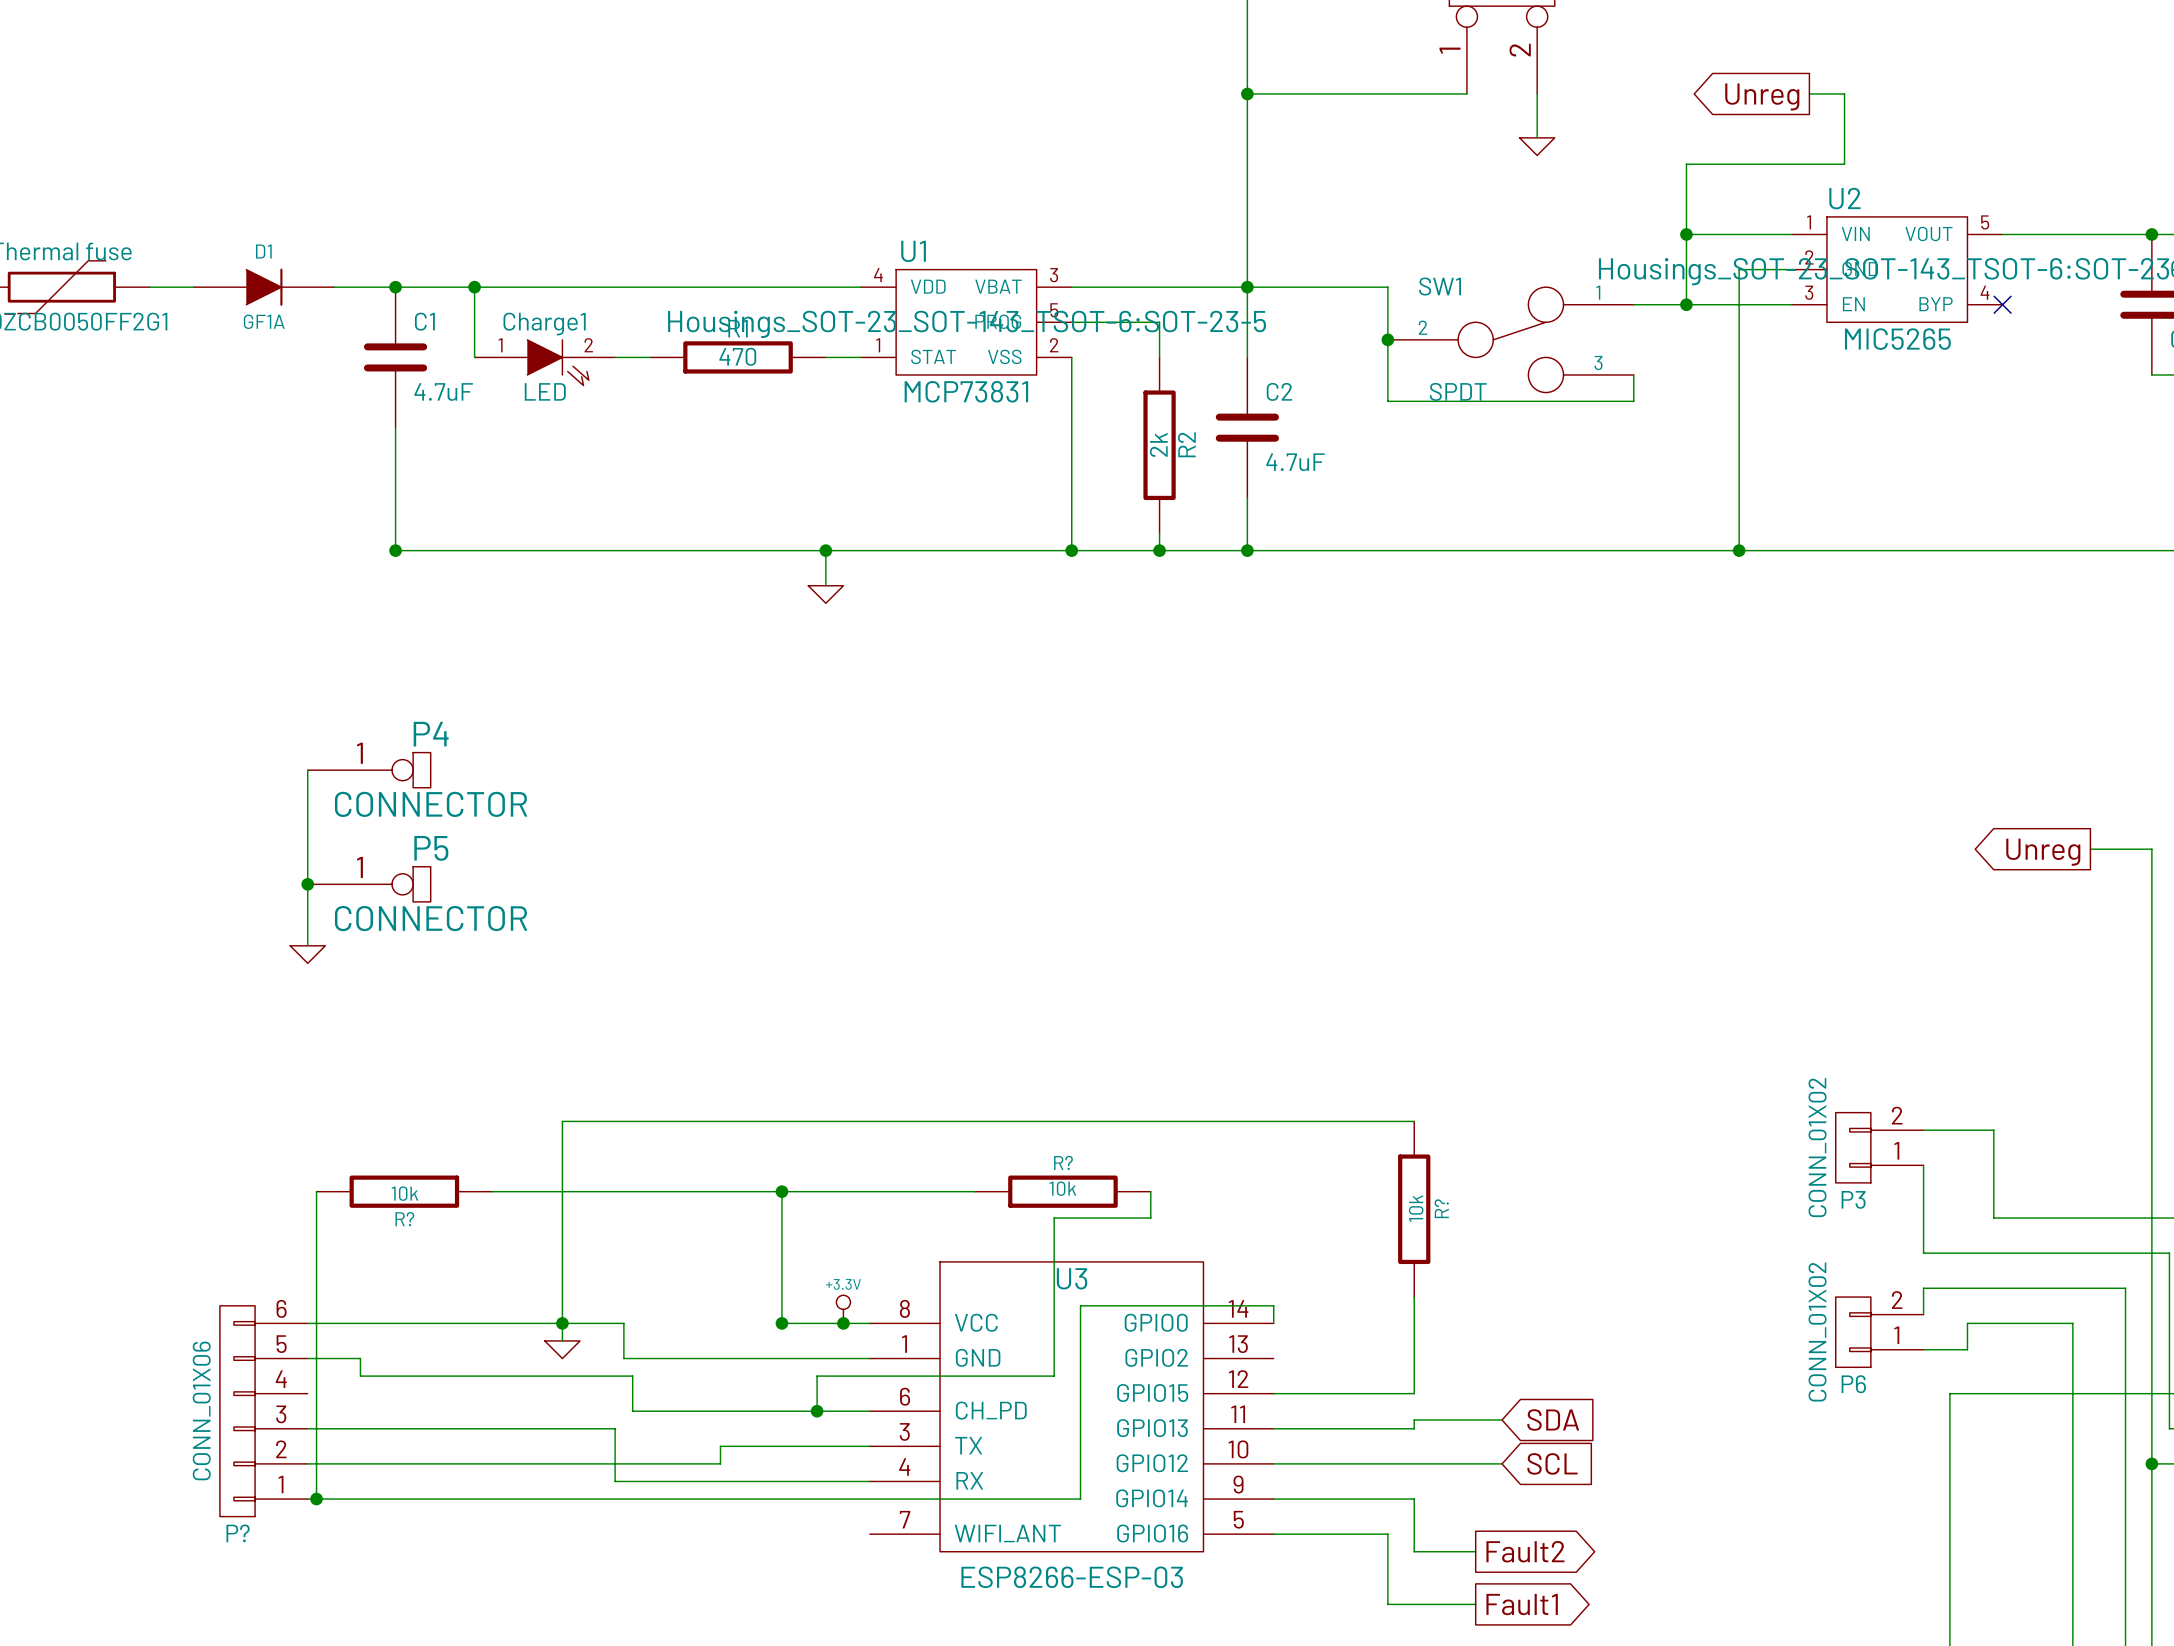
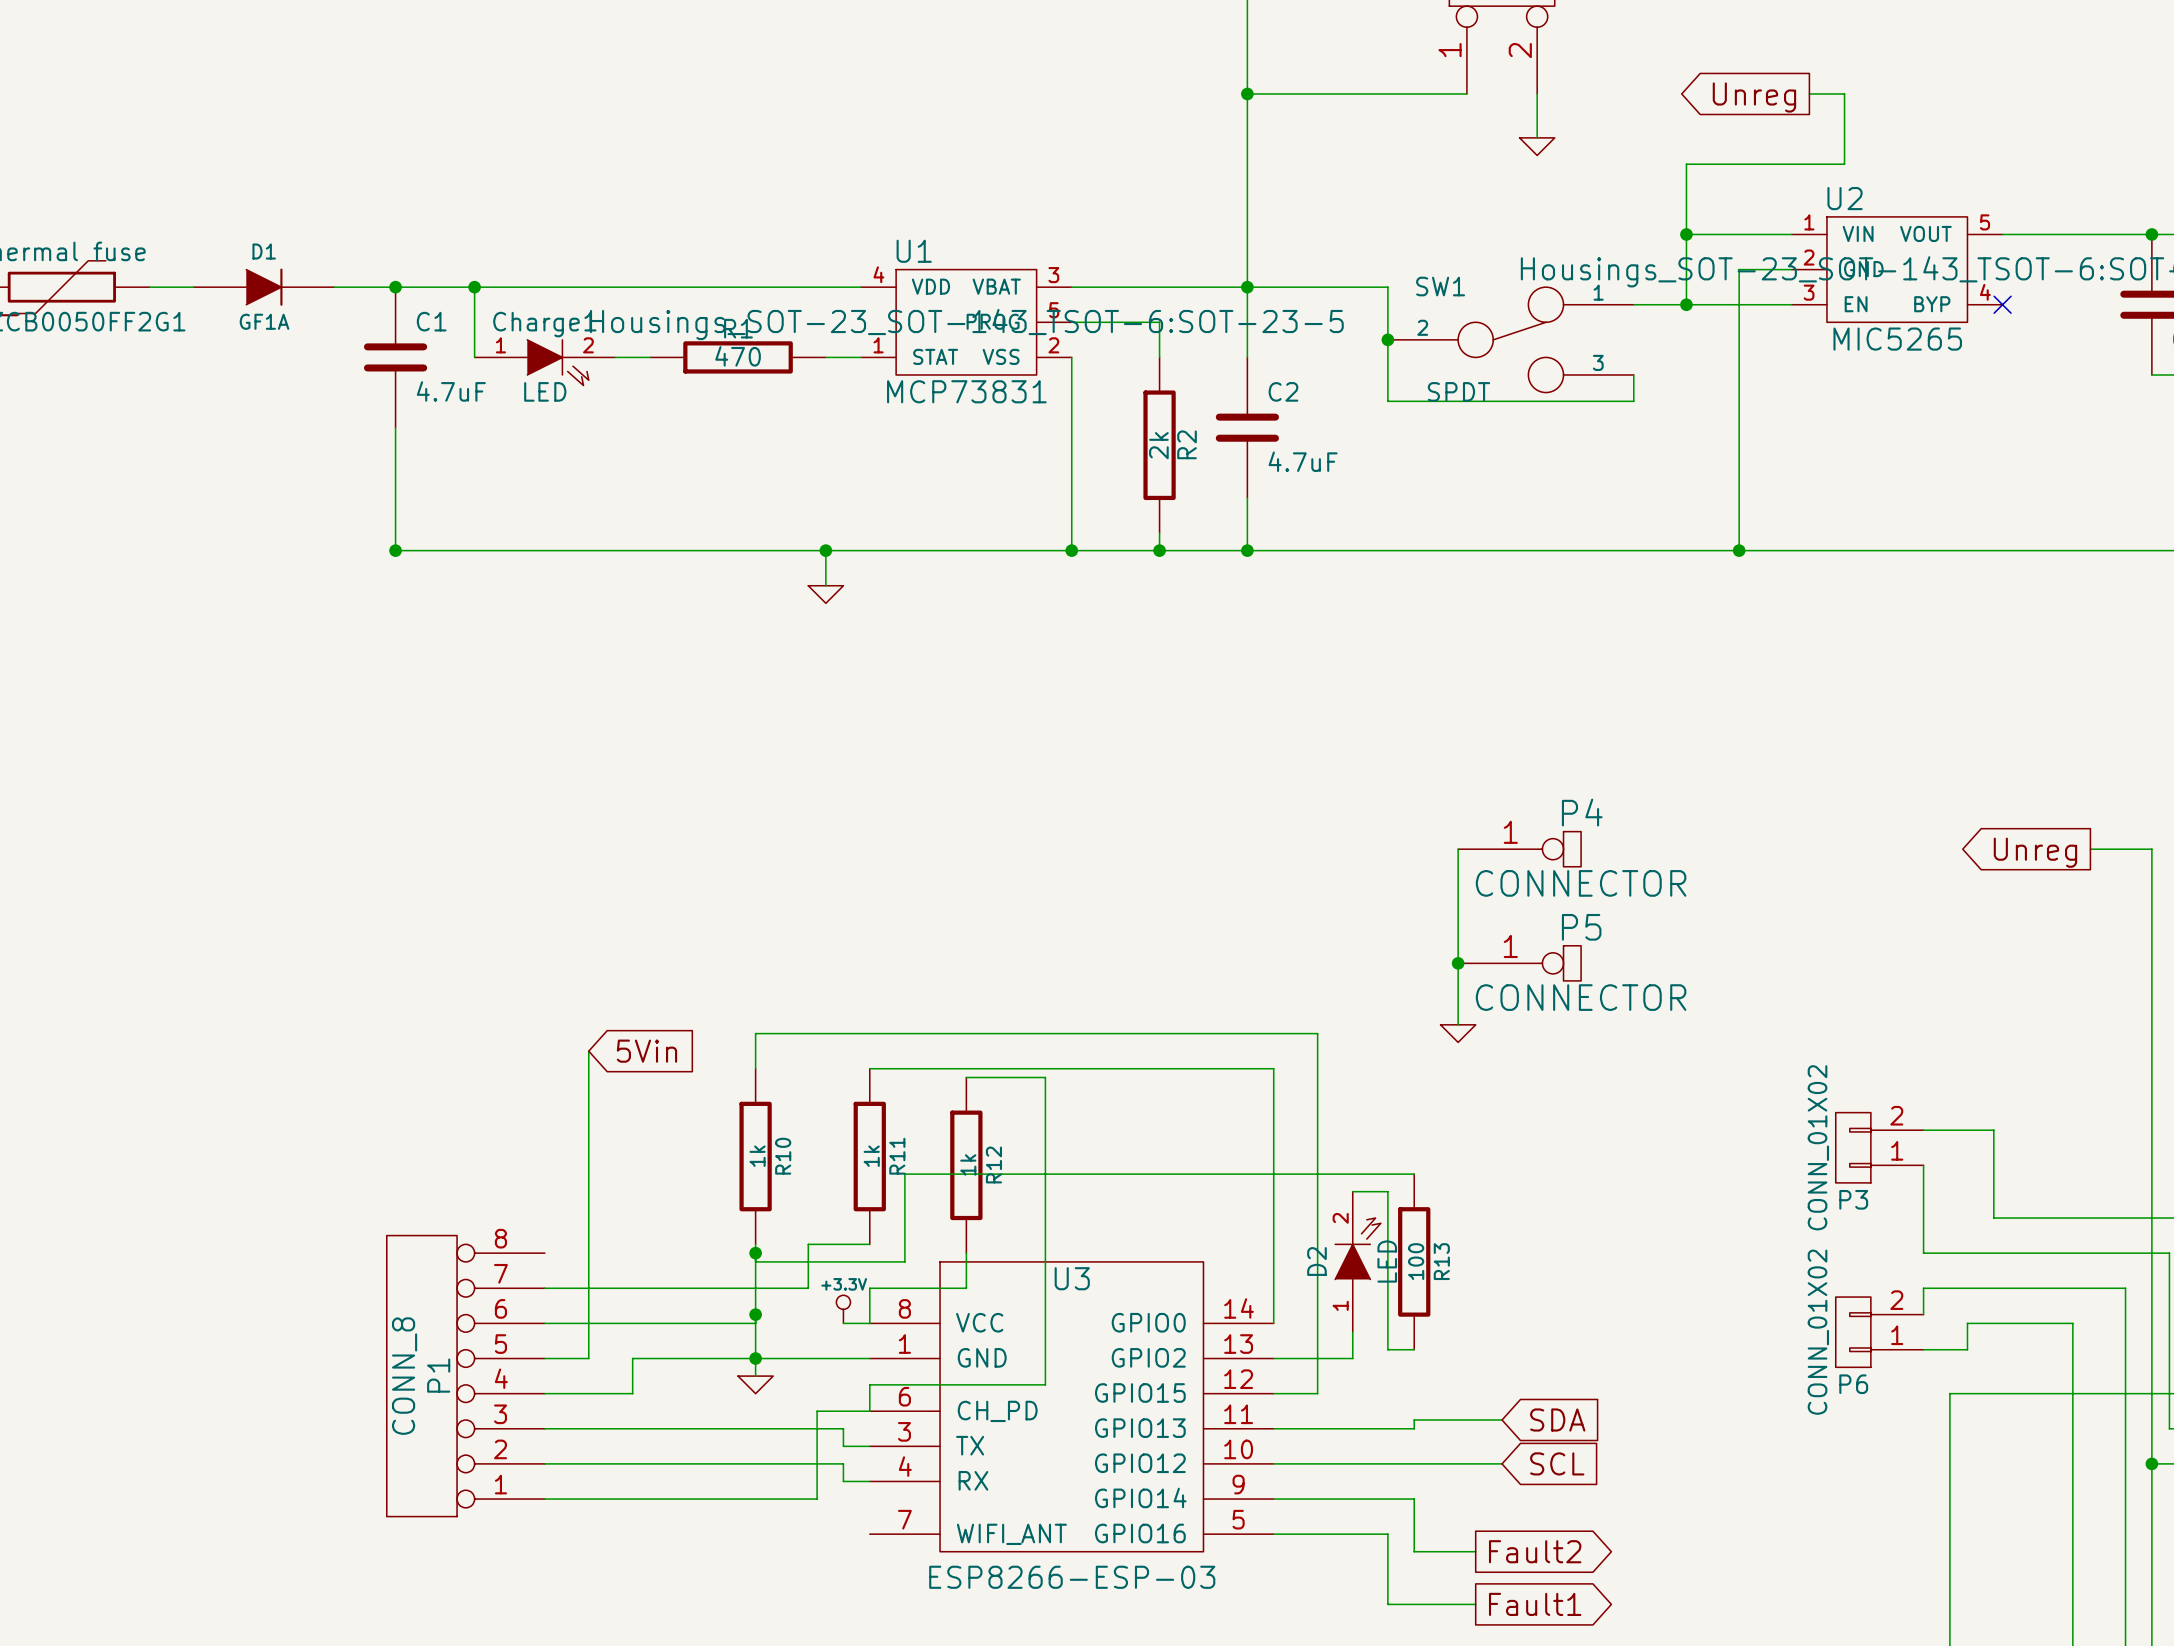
wire: (307, 770) (307, 945) -> none
P4 position: (369, 770) -> (1519, 849)
wire: none -> (1458, 849) (1458, 1024)
junction: (307, 884) -> none
P5 position: (369, 884) -> (1519, 963)
power symbol: (307, 954) -> none
junction: none -> (1458, 963)
power symbol: none -> (1458, 1033)
wire: none -> (588, 1051) (588, 1358) (544, 1358)
global label: none -> 5Vin (646, 1051)
wire: none -> (966, 1077) (1045, 1077) (1045, 1384) (869, 1384) (869, 1411)
wire: (1414, 1121) (562, 1121) (562, 1340) -> none
R10: none -> 1k (755, 1156)
R11: none -> 1k (869, 1156)
R12: none -> 1k (966, 1165)
wire: none -> (1414, 1174) (904, 1174) (904, 1261) (755, 1261)
wire: (316, 1191) (316, 1499) -> none
R?: 10k (404, 1191) -> none
wire: (492, 1191) (975, 1191) -> none
wire: (781, 1191) (781, 1323) (843, 1323) -> none
junction: (781, 1191) -> none
R?: 10k (1062, 1191) -> none
wire: (1150, 1191) (1150, 1218) (1054, 1218) (1054, 1376) (817, 1376) (817, 1411) (632, 1411) (632, 1393) -> (544, 1393) (632, 1393)
wire: none -> (1352, 1191) (1387, 1191) (1387, 1349) (1414, 1349)
R?: 10k (1414, 1209) -> none
wire: none -> (755, 1244) (755, 1376)
wire: none -> (869, 1244) (808, 1244) (808, 1288) (544, 1288)
junction: none -> (755, 1253)
wire: none -> (966, 1253) (966, 1288) (869, 1288) (869, 1323)
D2: none -> LED (1358, 1261)
R13: none -> 100 (1414, 1261)
wire: (1414, 1297) (1414, 1393) (1317, 1393) -> (755, 1068) (755, 1033) (1317, 1033) (1317, 1393)
wire: (1273, 1305) (1080, 1305) (1080, 1499) (817, 1499) -> (1273, 1305) (1273, 1068) (869, 1068)
junction: none -> (755, 1314)
wire: (307, 1323) (544, 1323) -> none
junction: (562, 1323) -> none
wire: (623, 1323) (623, 1358) (632, 1358) -> (632, 1376) (632, 1358)
wire: none -> (623, 1323) (755, 1323)
junction: (781, 1323) -> none
junction: (843, 1323) -> none
wire: none -> (1352, 1332) (1352, 1358) (1273, 1358)
power symbol position: (562, 1349) -> (755, 1384)
wire: (307, 1358) (360, 1358) (360, 1376) (632, 1376) -> none
junction: none -> (755, 1358)
P1: none -> CONN_8 (465, 1376)
P?: CONN_01X06 (263, 1411) -> none
wire: none -> (817, 1411) (817, 1499)
junction: (817, 1411) -> none
wire: (307, 1428) (544, 1428) -> none
wire: (615, 1428) (615, 1481) (843, 1481) -> (615, 1428) (843, 1428) (843, 1446)
wire: (843, 1446) (720, 1446) (720, 1463) -> (843, 1481) (843, 1463) (720, 1463)
wire: (307, 1463) (544, 1463) -> none
wire: (307, 1499) (544, 1499) -> none
junction: (316, 1499) -> none

